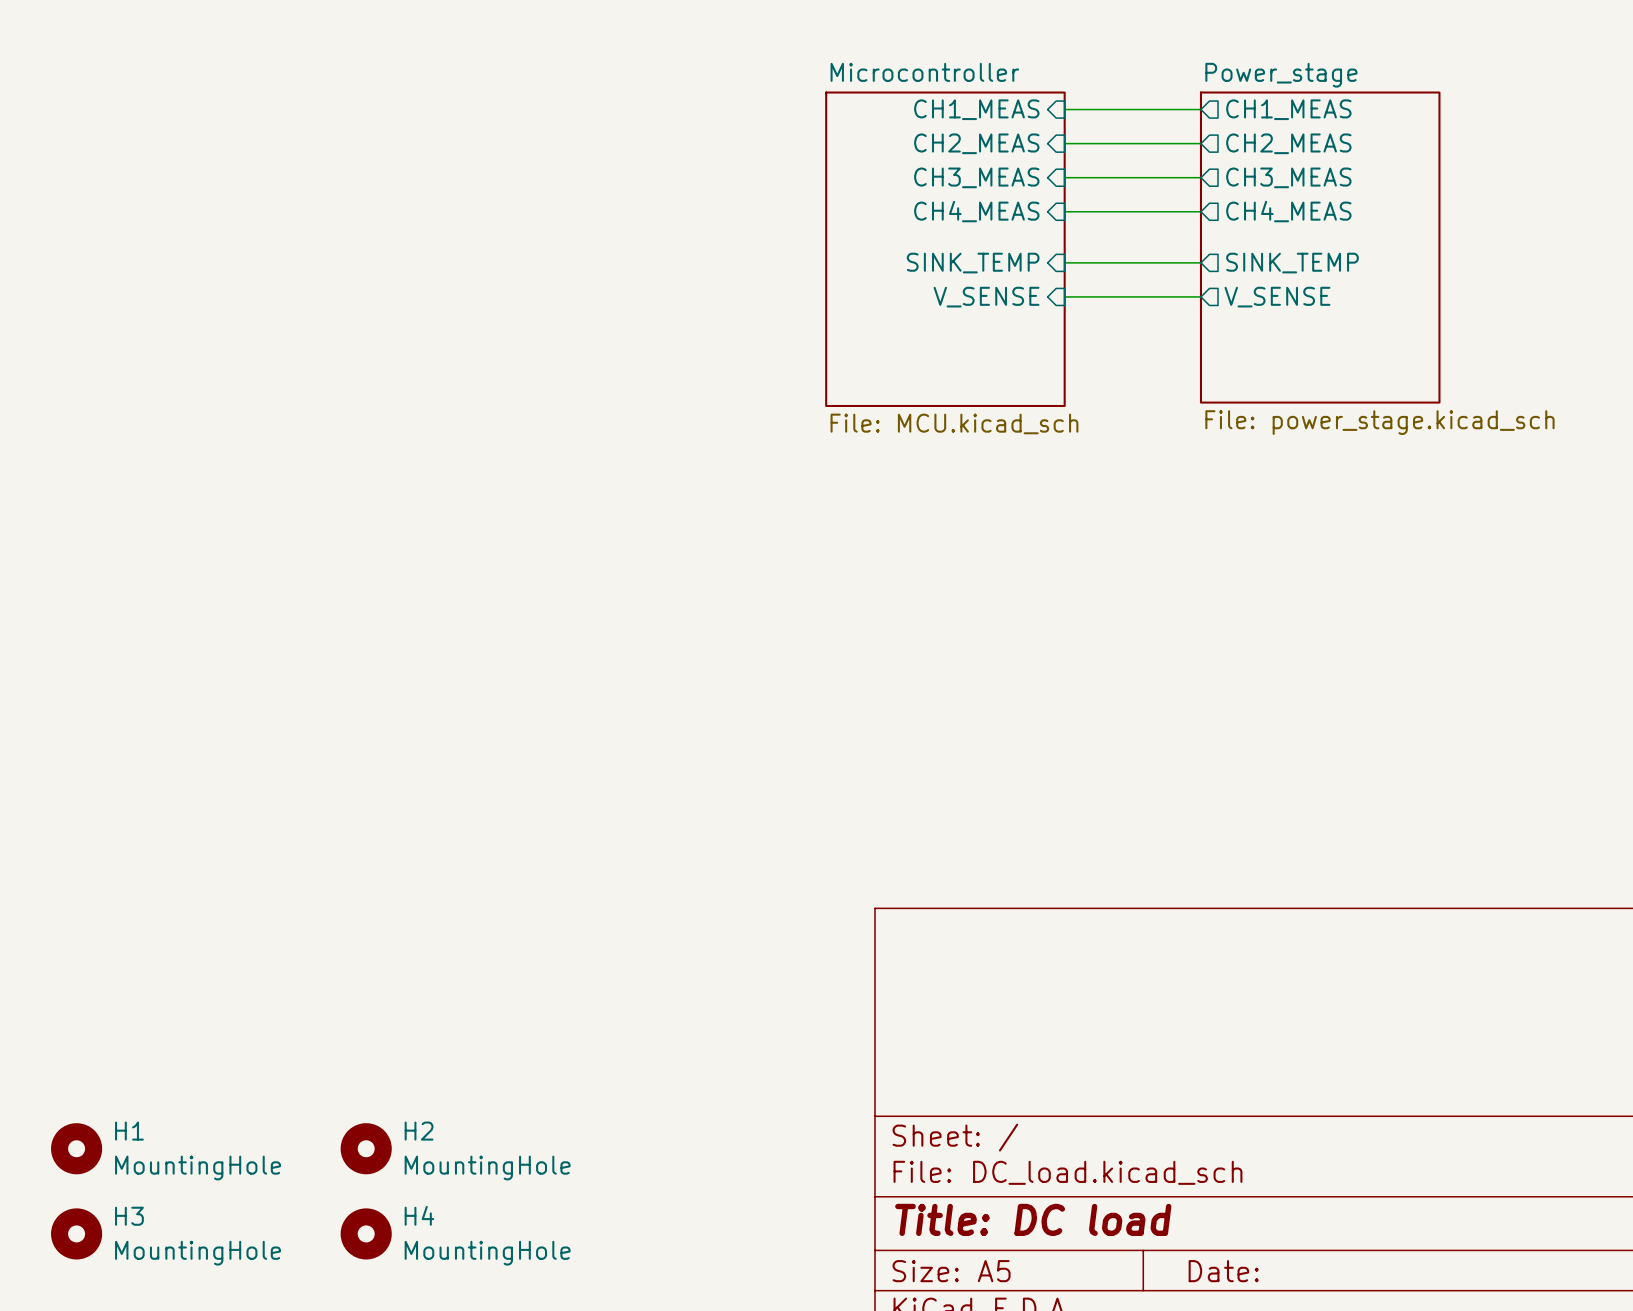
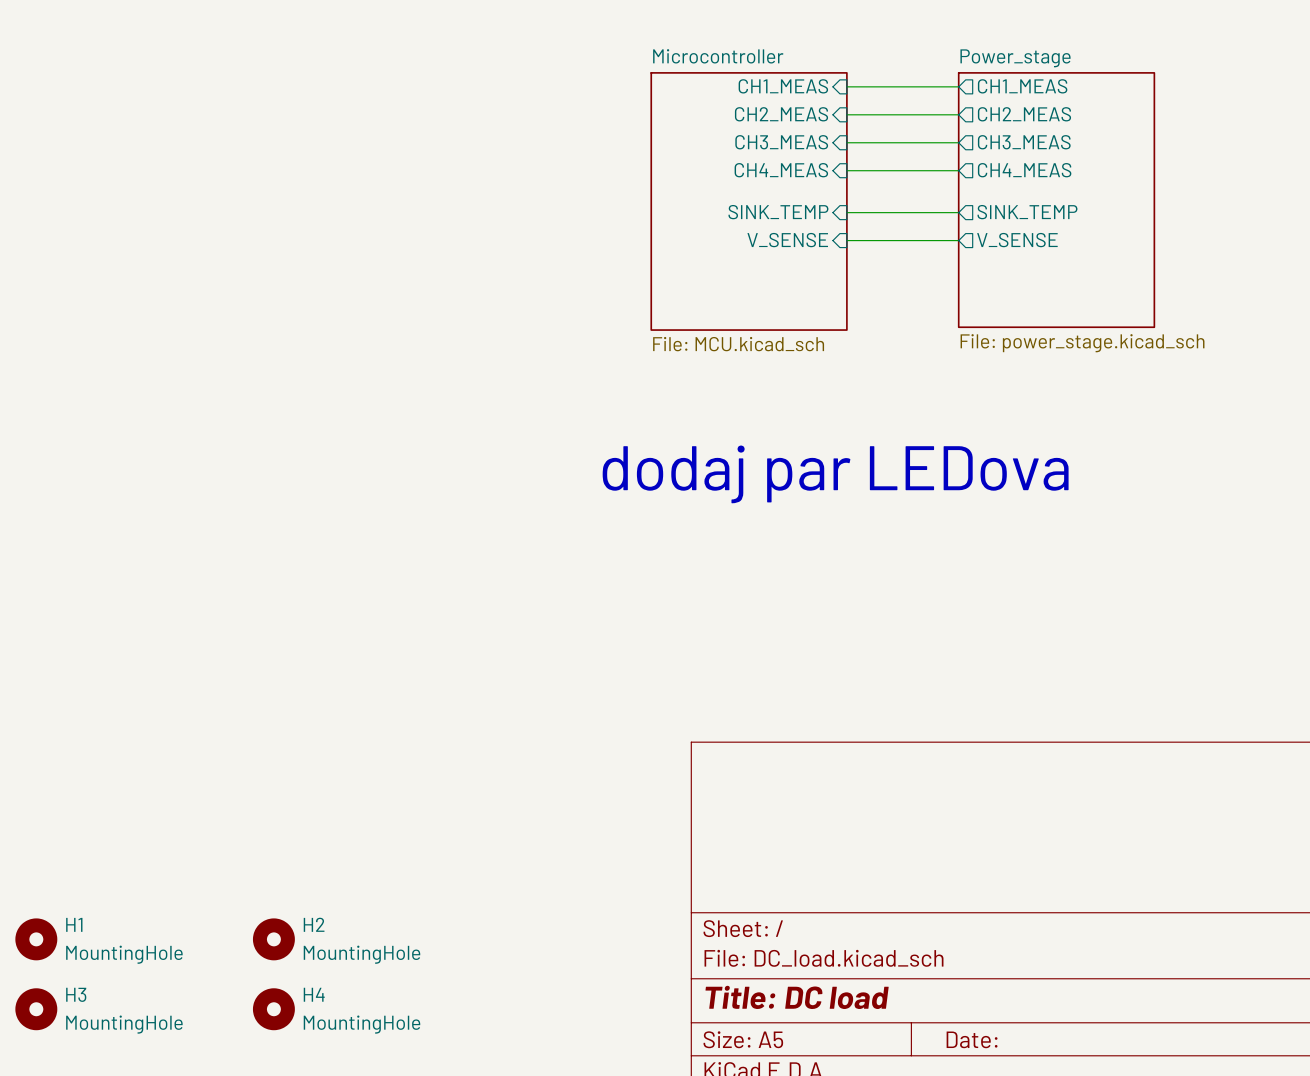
text: none -> dodaj par LEDova (835, 474)

